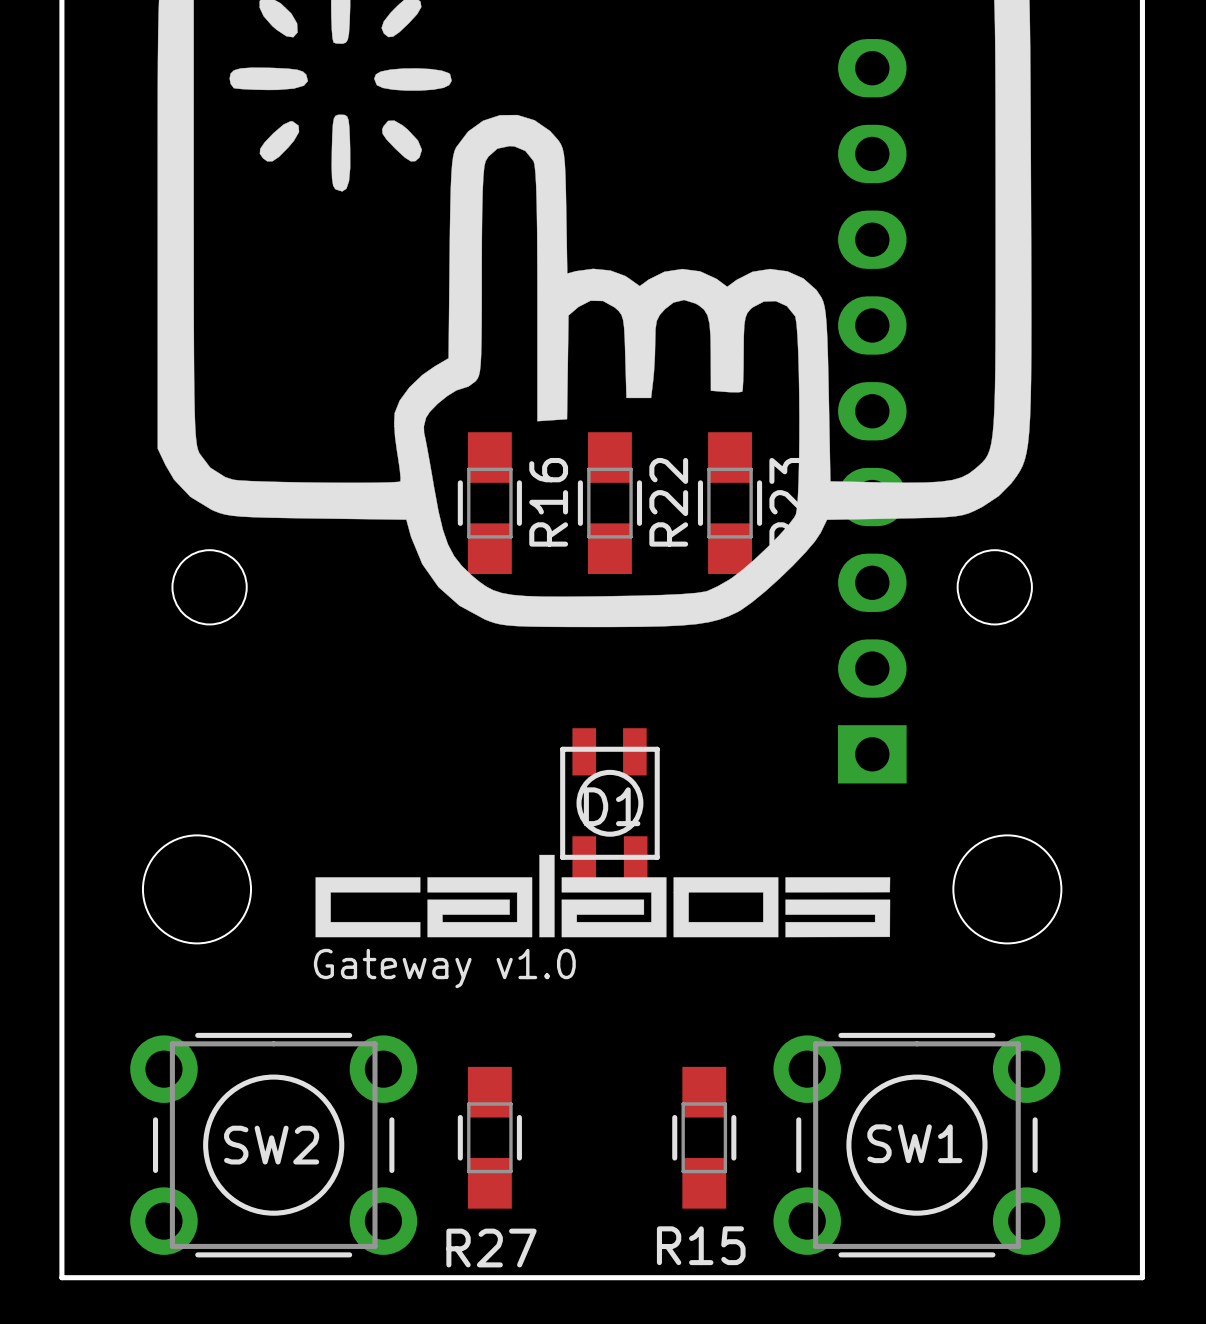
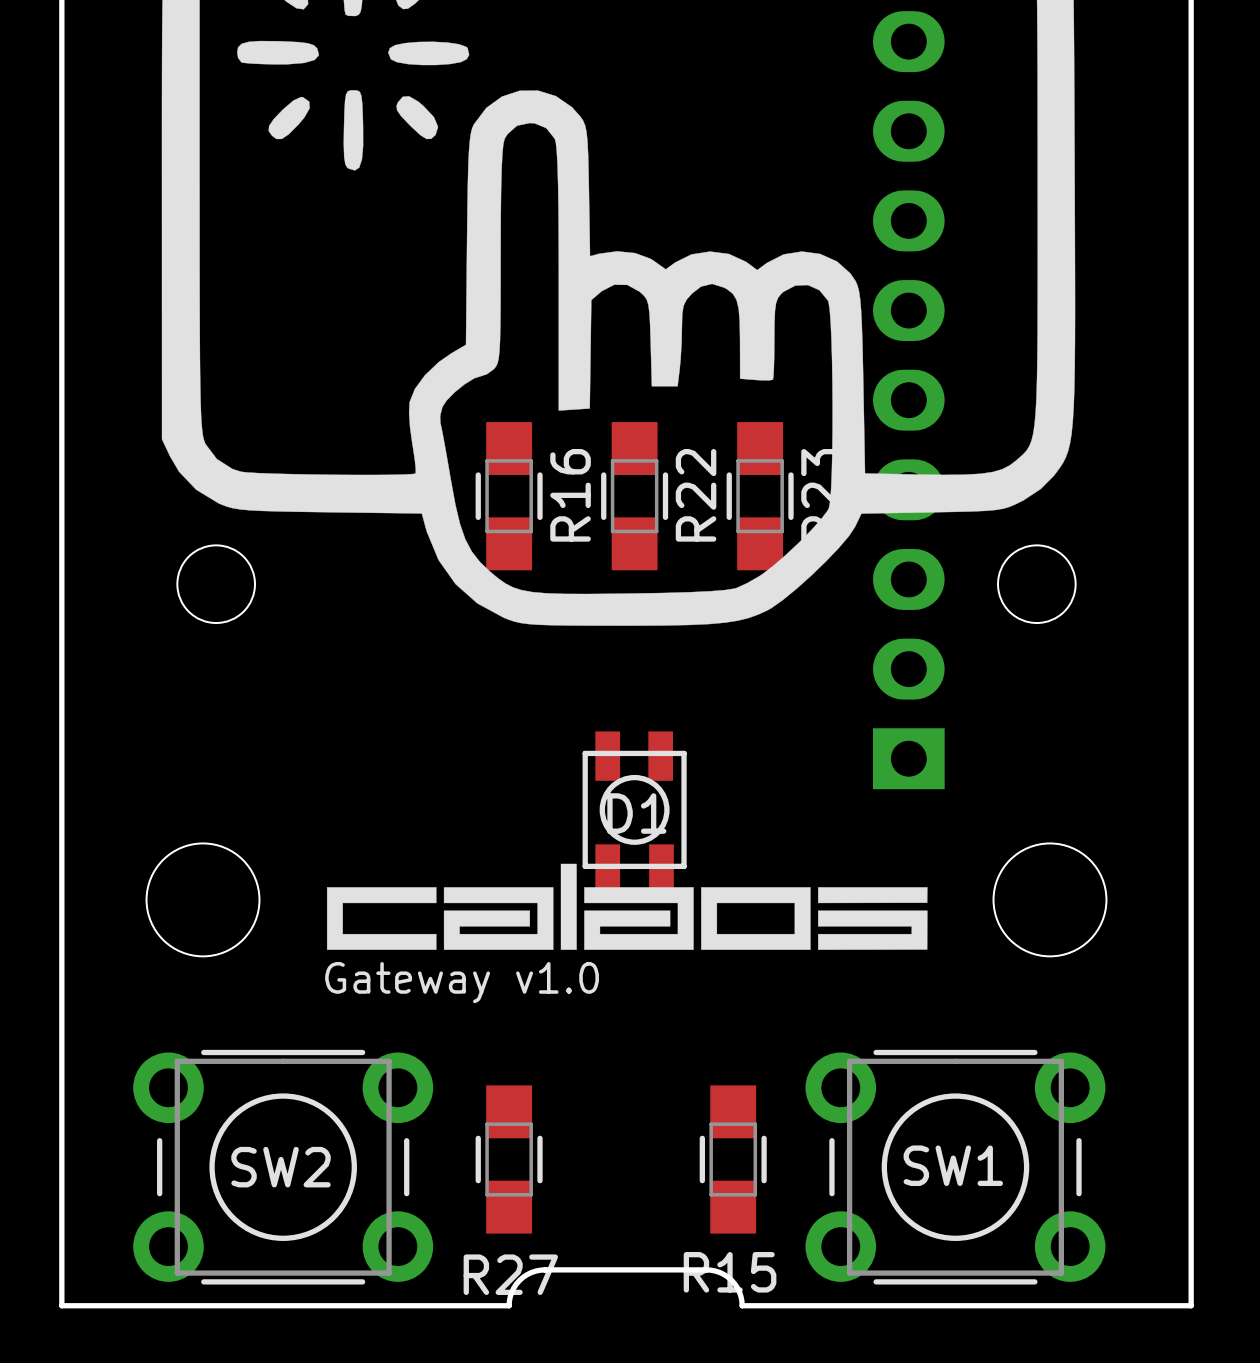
board edge: (489, 1277) (712, 1277) -> (509, 1305) (511, 1292) (516, 1283) (527, 1274) (540, 1270) (706, 1269) (720, 1272) (731, 1280) (739, 1292) (742, 1305)

